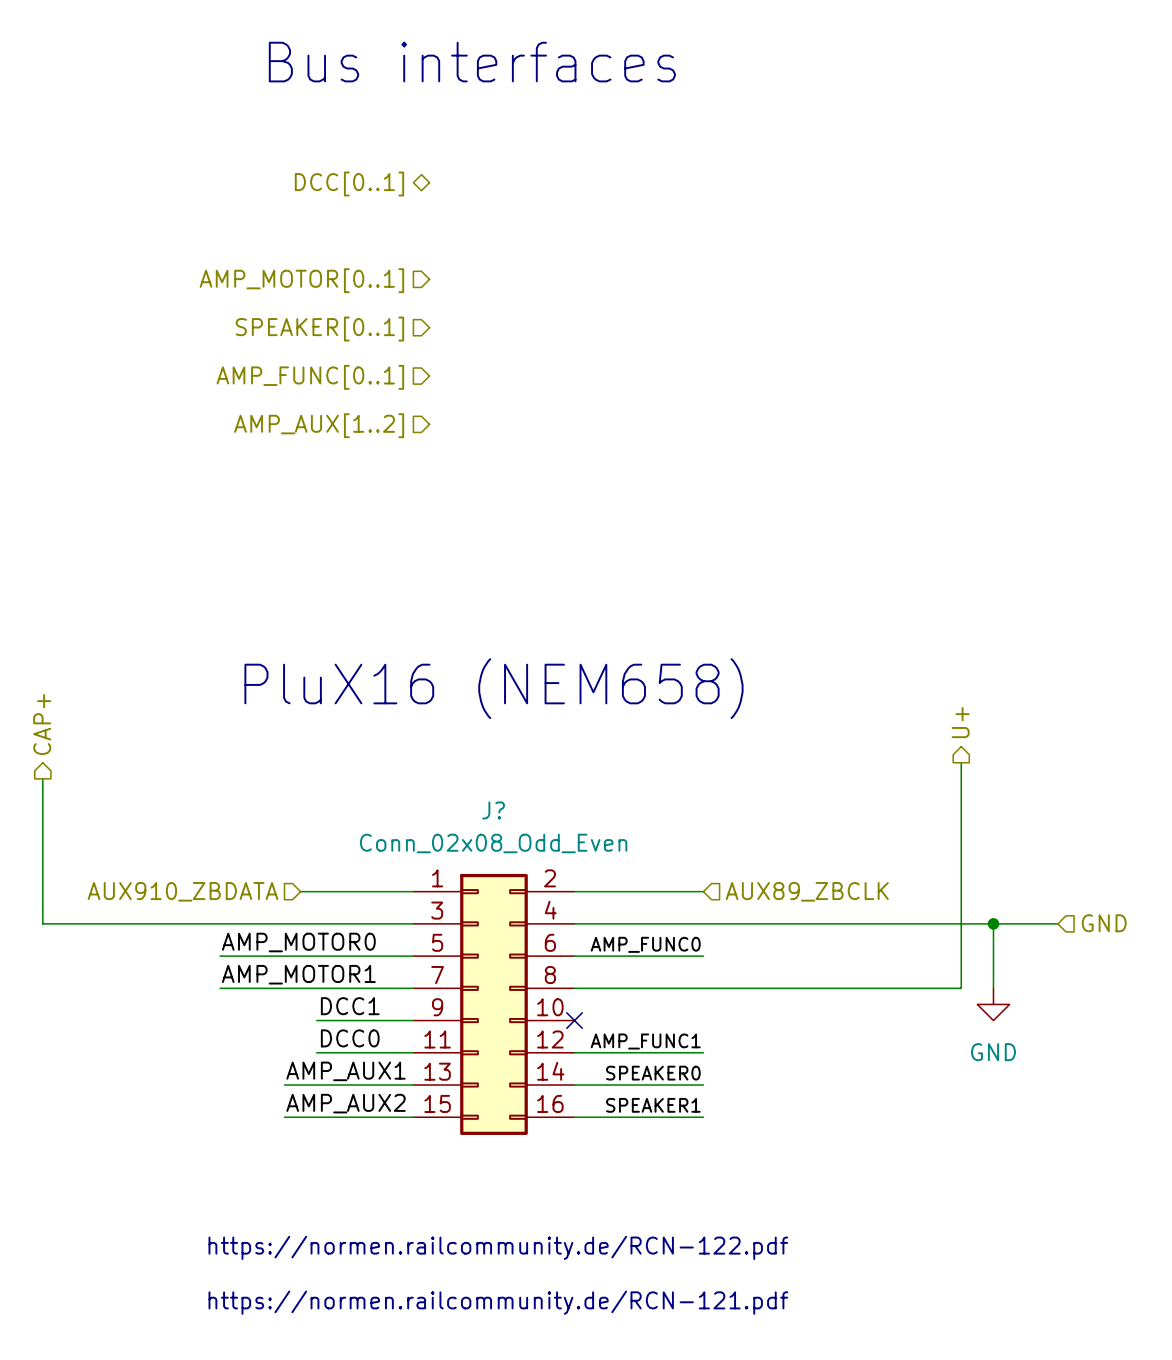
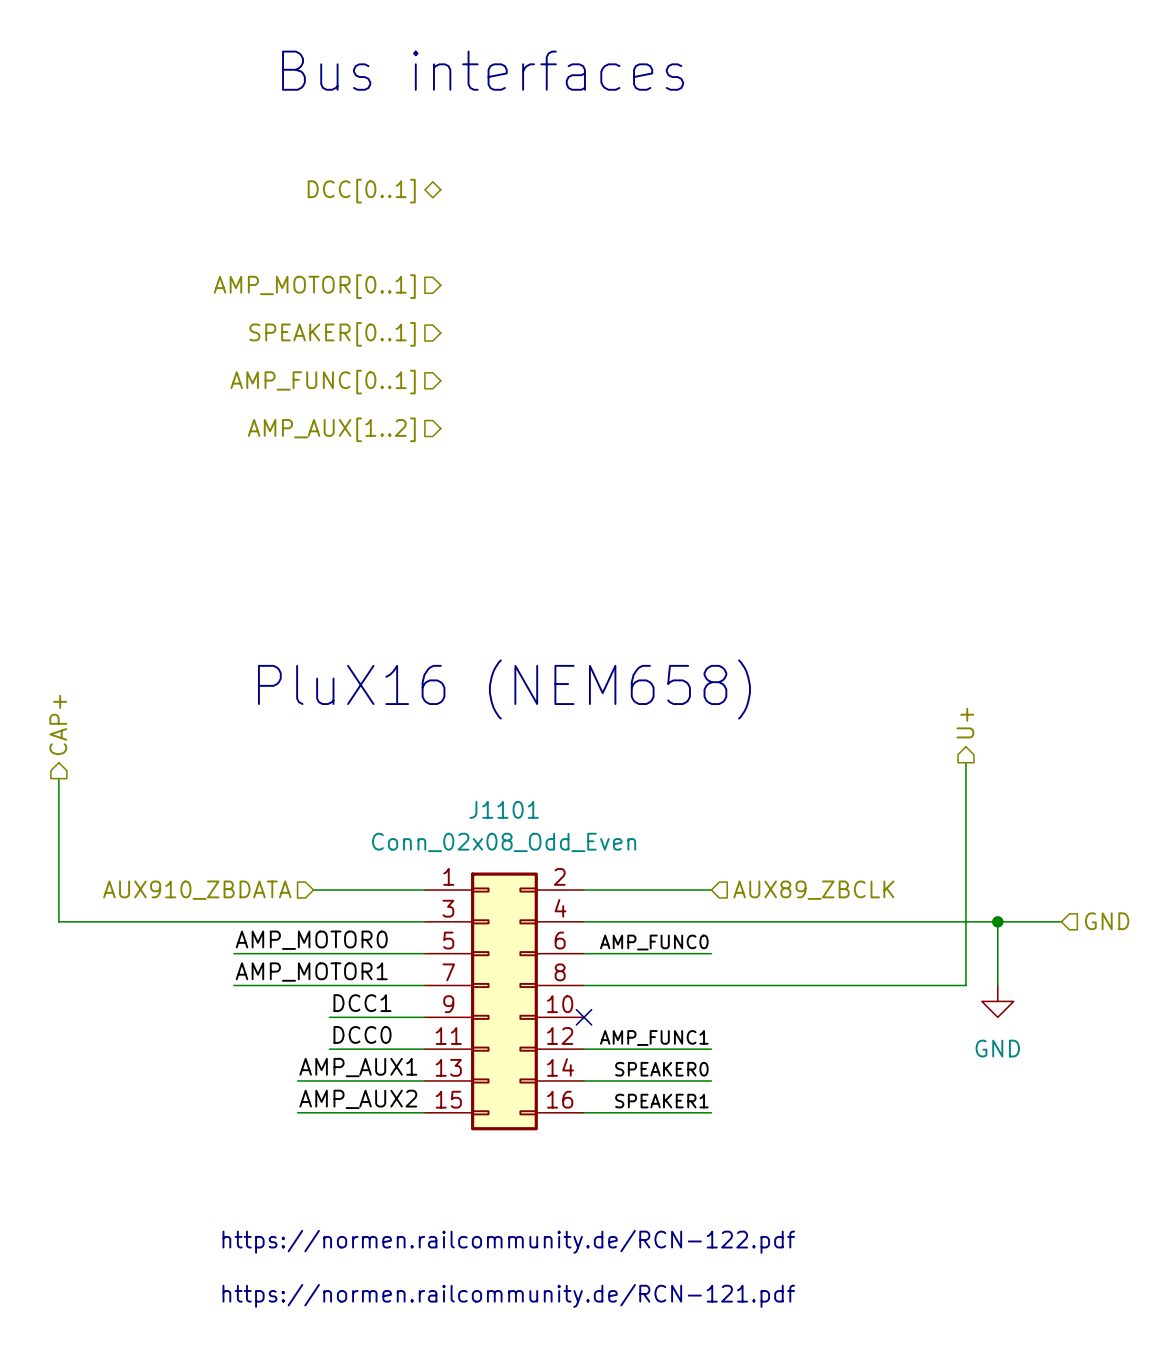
J? name: J? (493, 810) -> J1101 (504, 809)

